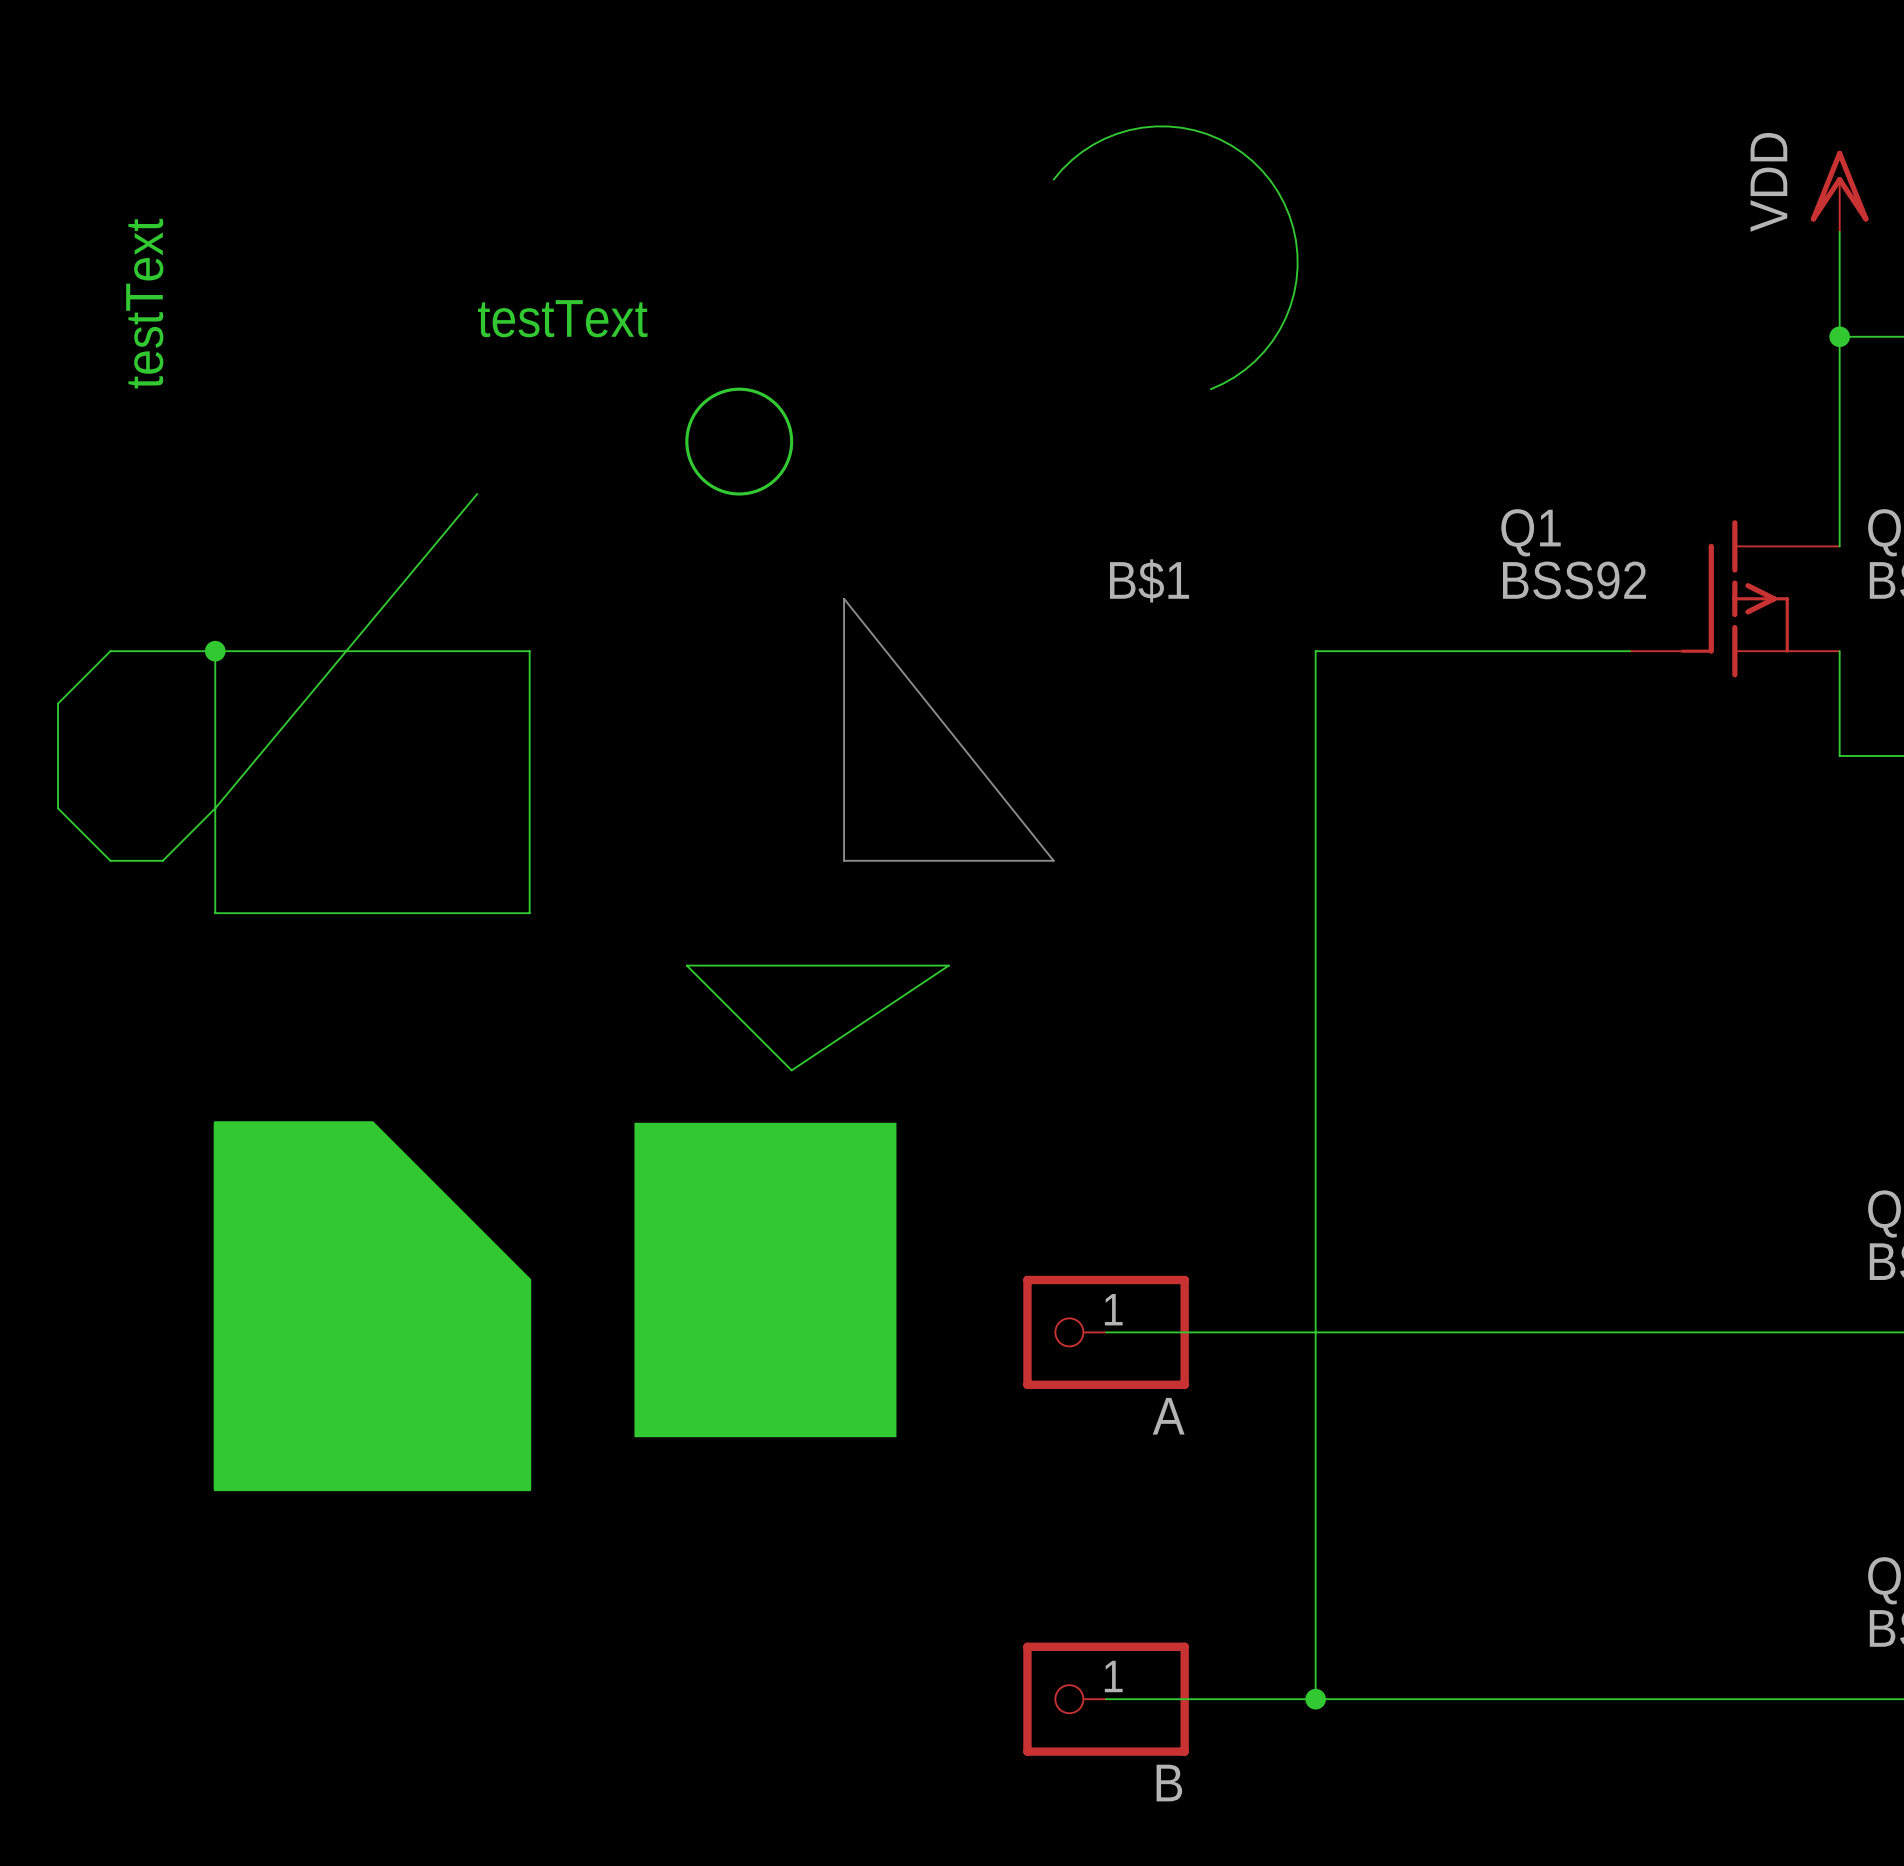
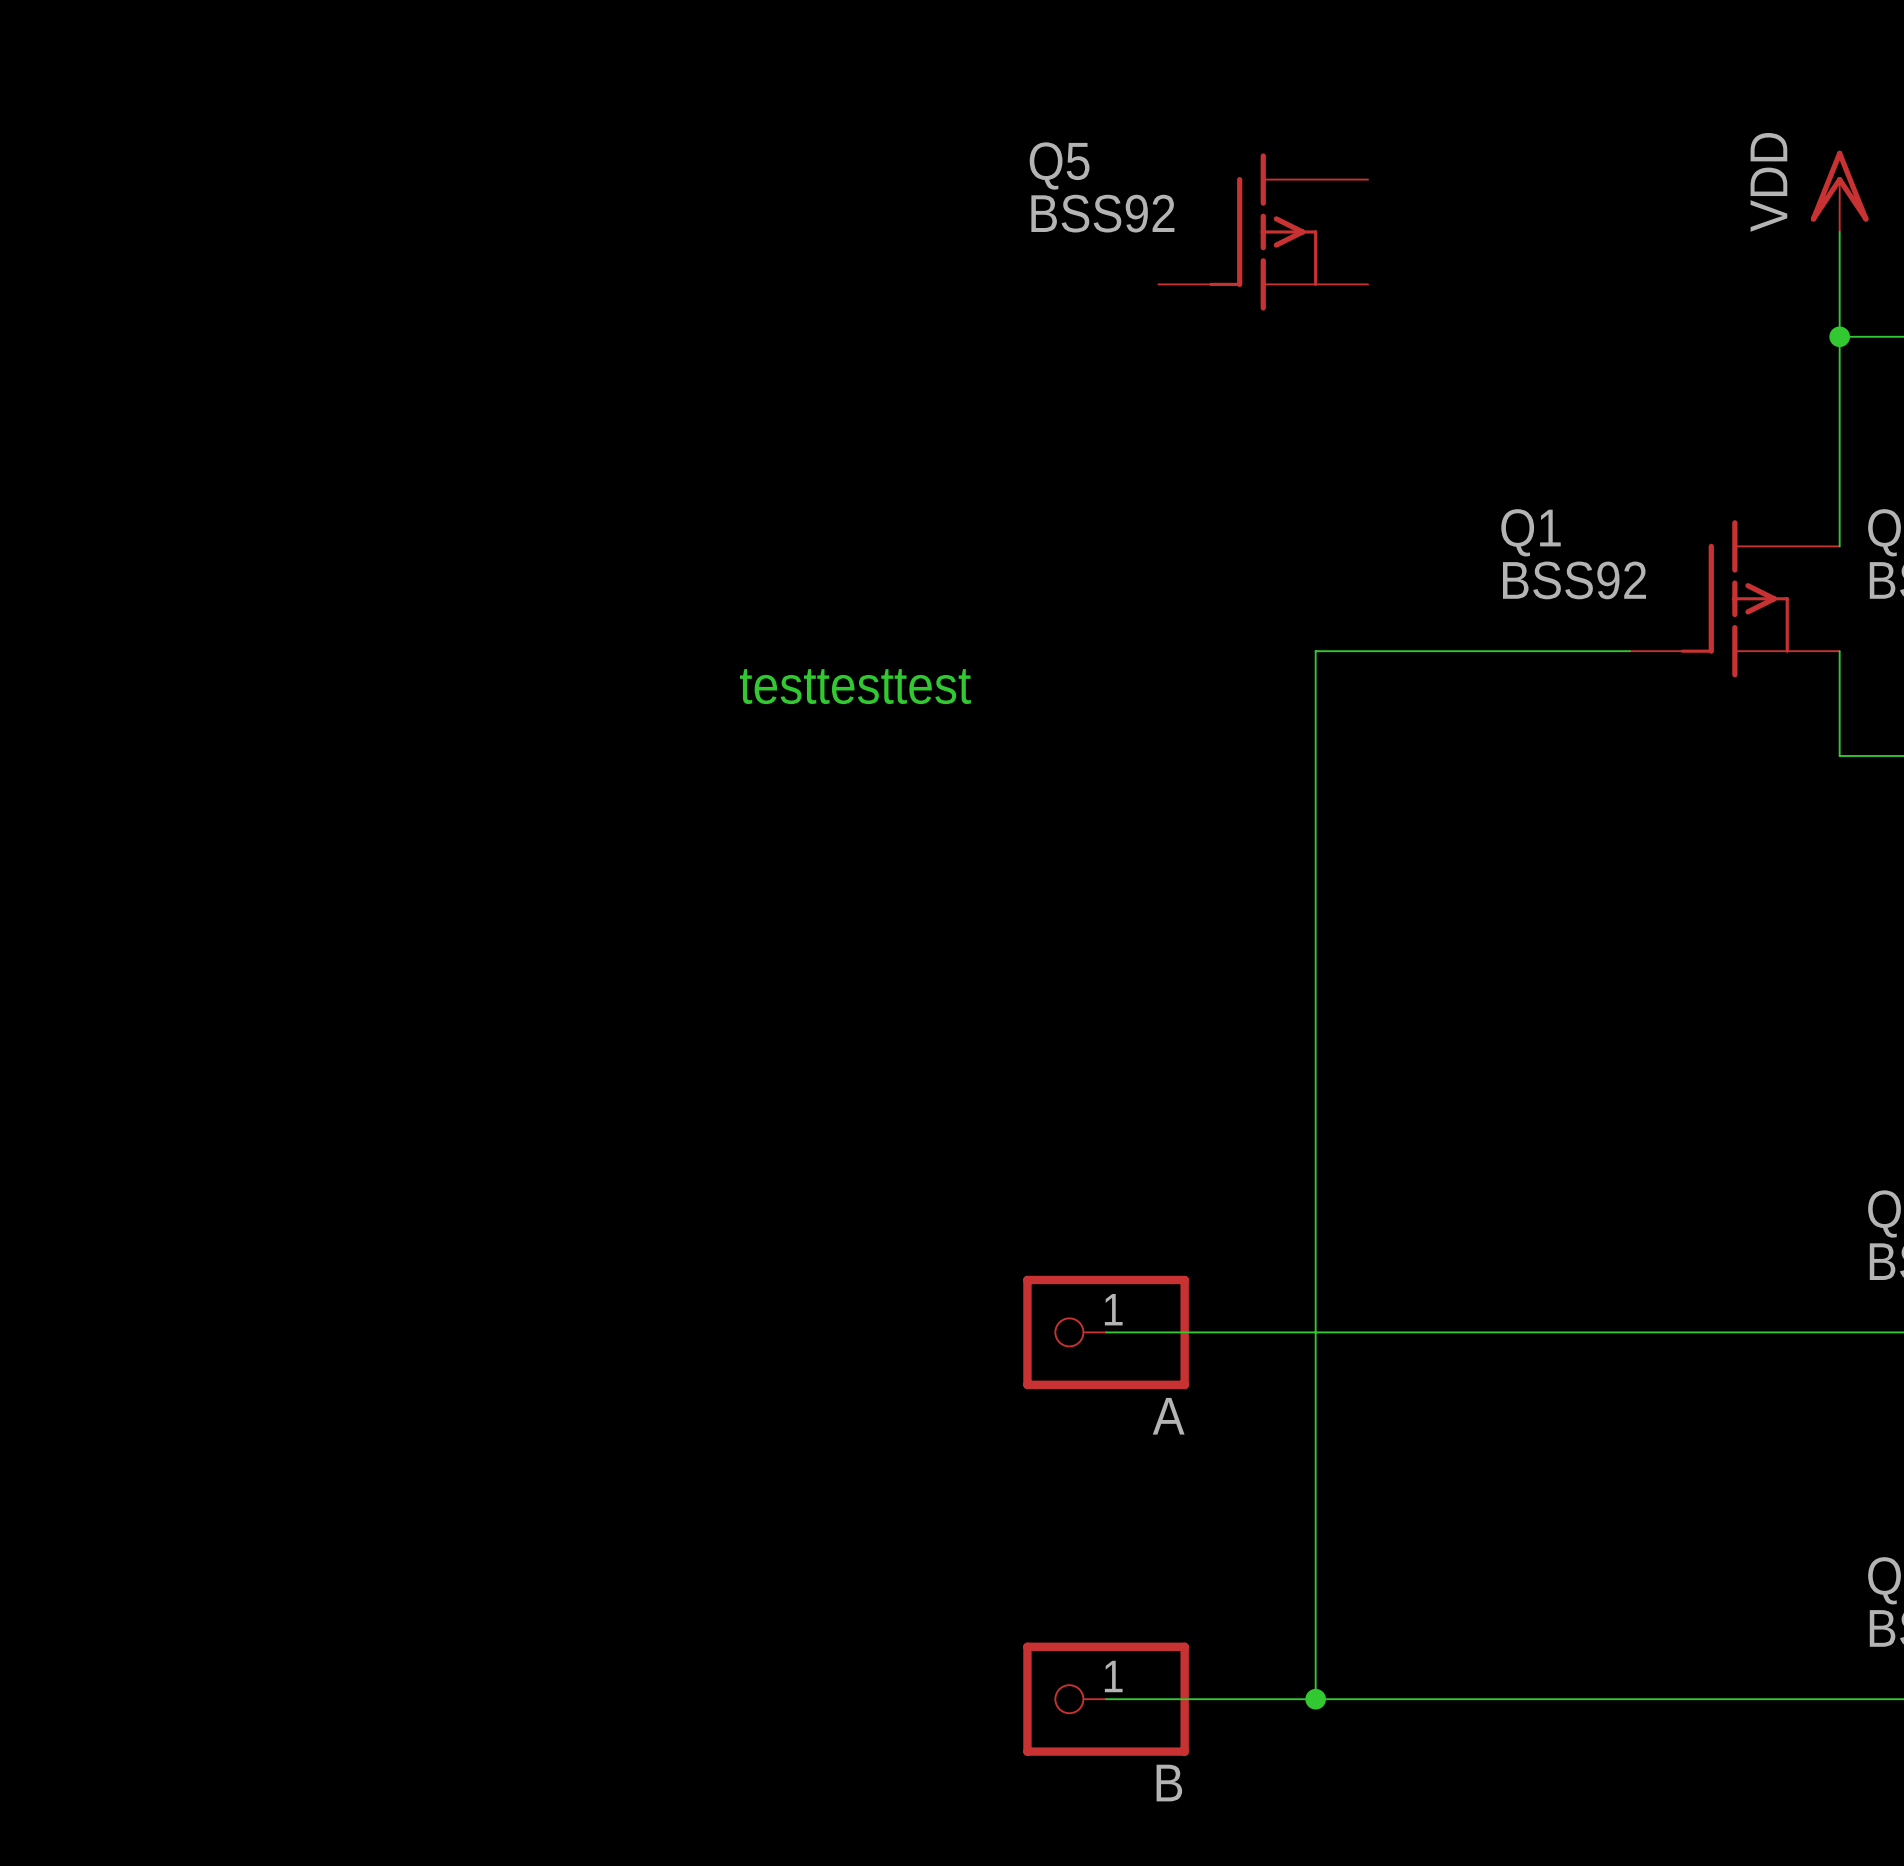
wire: (1053, 179) (1071, 160) (1104, 138) (1129, 130) (1168, 126) (1195, 130) (1219, 139) (1252, 161) (1270, 180) (1284, 203) (1293, 227) (1297, 267) (1294, 293) (1279, 330) (1264, 351) (1245, 369) (1210, 389) -> none
Q5: none -> BSS92 (1263, 231)
text: testText (144, 303) -> none
text: testText (562, 318) -> none
drawing: [685, 387, 794, 496] -> none
wire: (477, 493) (215, 808) (162, 860) (110, 860) (58, 808) (58, 703) (110, 651) (529, 651) (529, 913) (215, 913) (215, 651) -> none
label: B$1 (1149, 580) -> none
bus: (844, 598) (844, 860) (1053, 860) (844, 598) -> none
junction: (215, 651) -> none
text: none -> testtesttest (855, 686)
wire: (686, 965) (948, 965) (791, 1070) (686, 965) -> none
drawing: [213, 1121, 532, 1492] -> none
drawing: [634, 1122, 897, 1438] -> none

